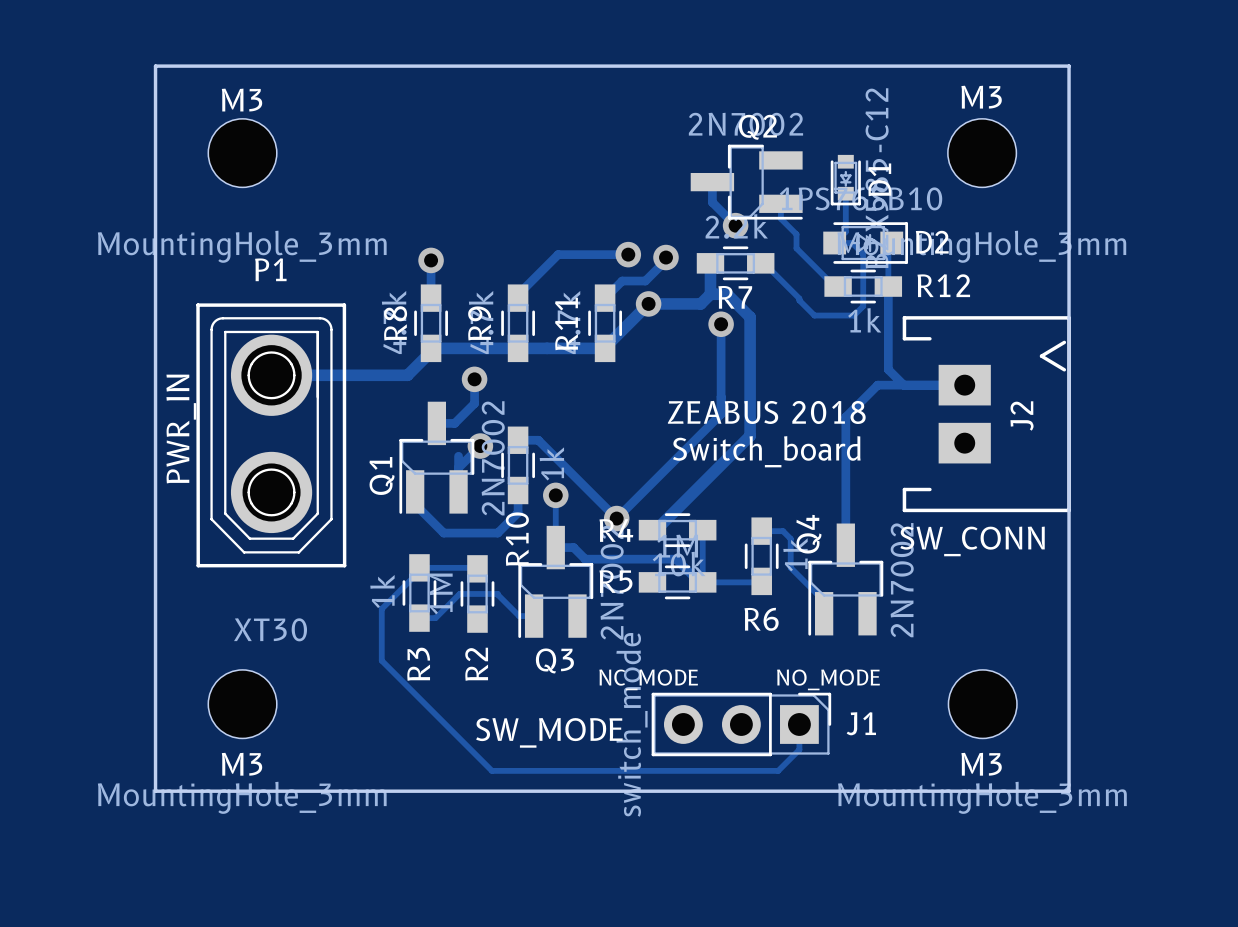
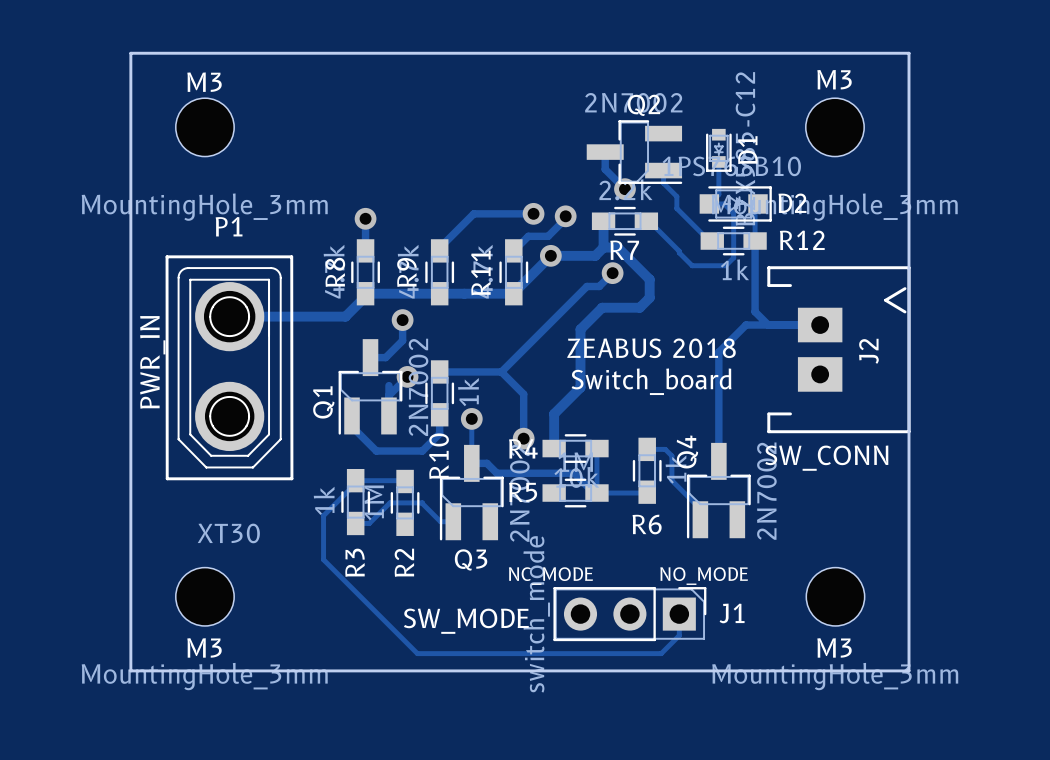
track: (750, 317) (750, 435) (655, 530) (652, 530) -> (637, 267) (649, 279) (649, 297) (639, 307) (602, 307) (580, 329) (580, 387) (554, 413) (554, 448)
track: (721, 324) (721, 414) (616, 518) (538, 440) -> (612, 273) (599, 286) (586, 286) (501, 371)
track: none -> (456, 371) (501, 371)
track: none -> (501, 371) (523, 394) (523, 438)

